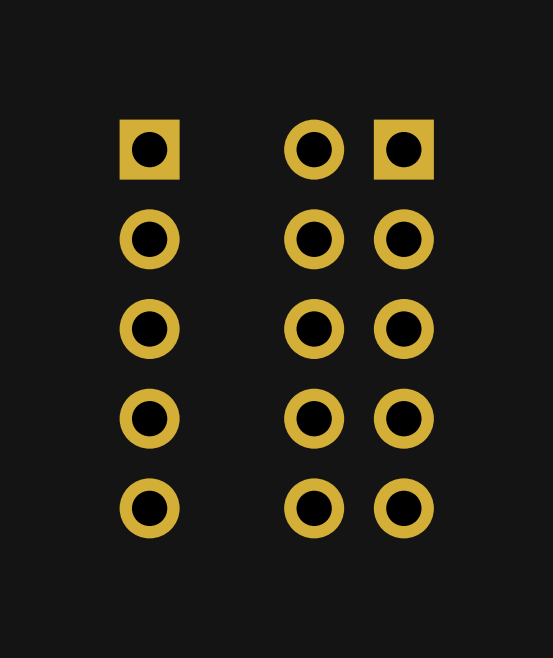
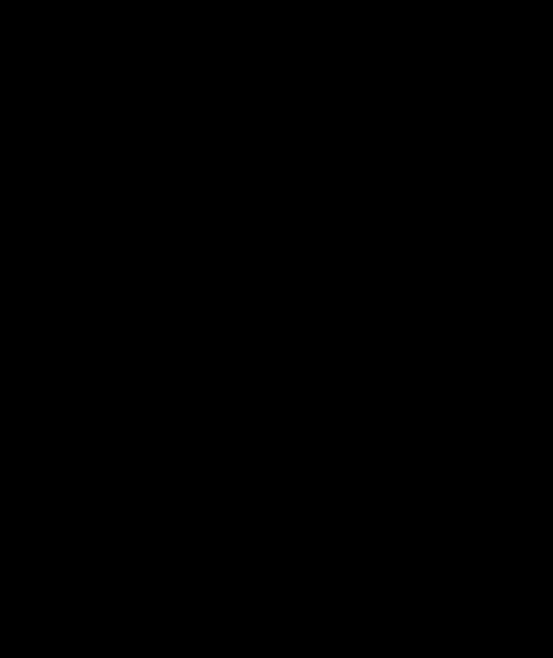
part: (149, 329) -> none
part: (359, 329) -> none

